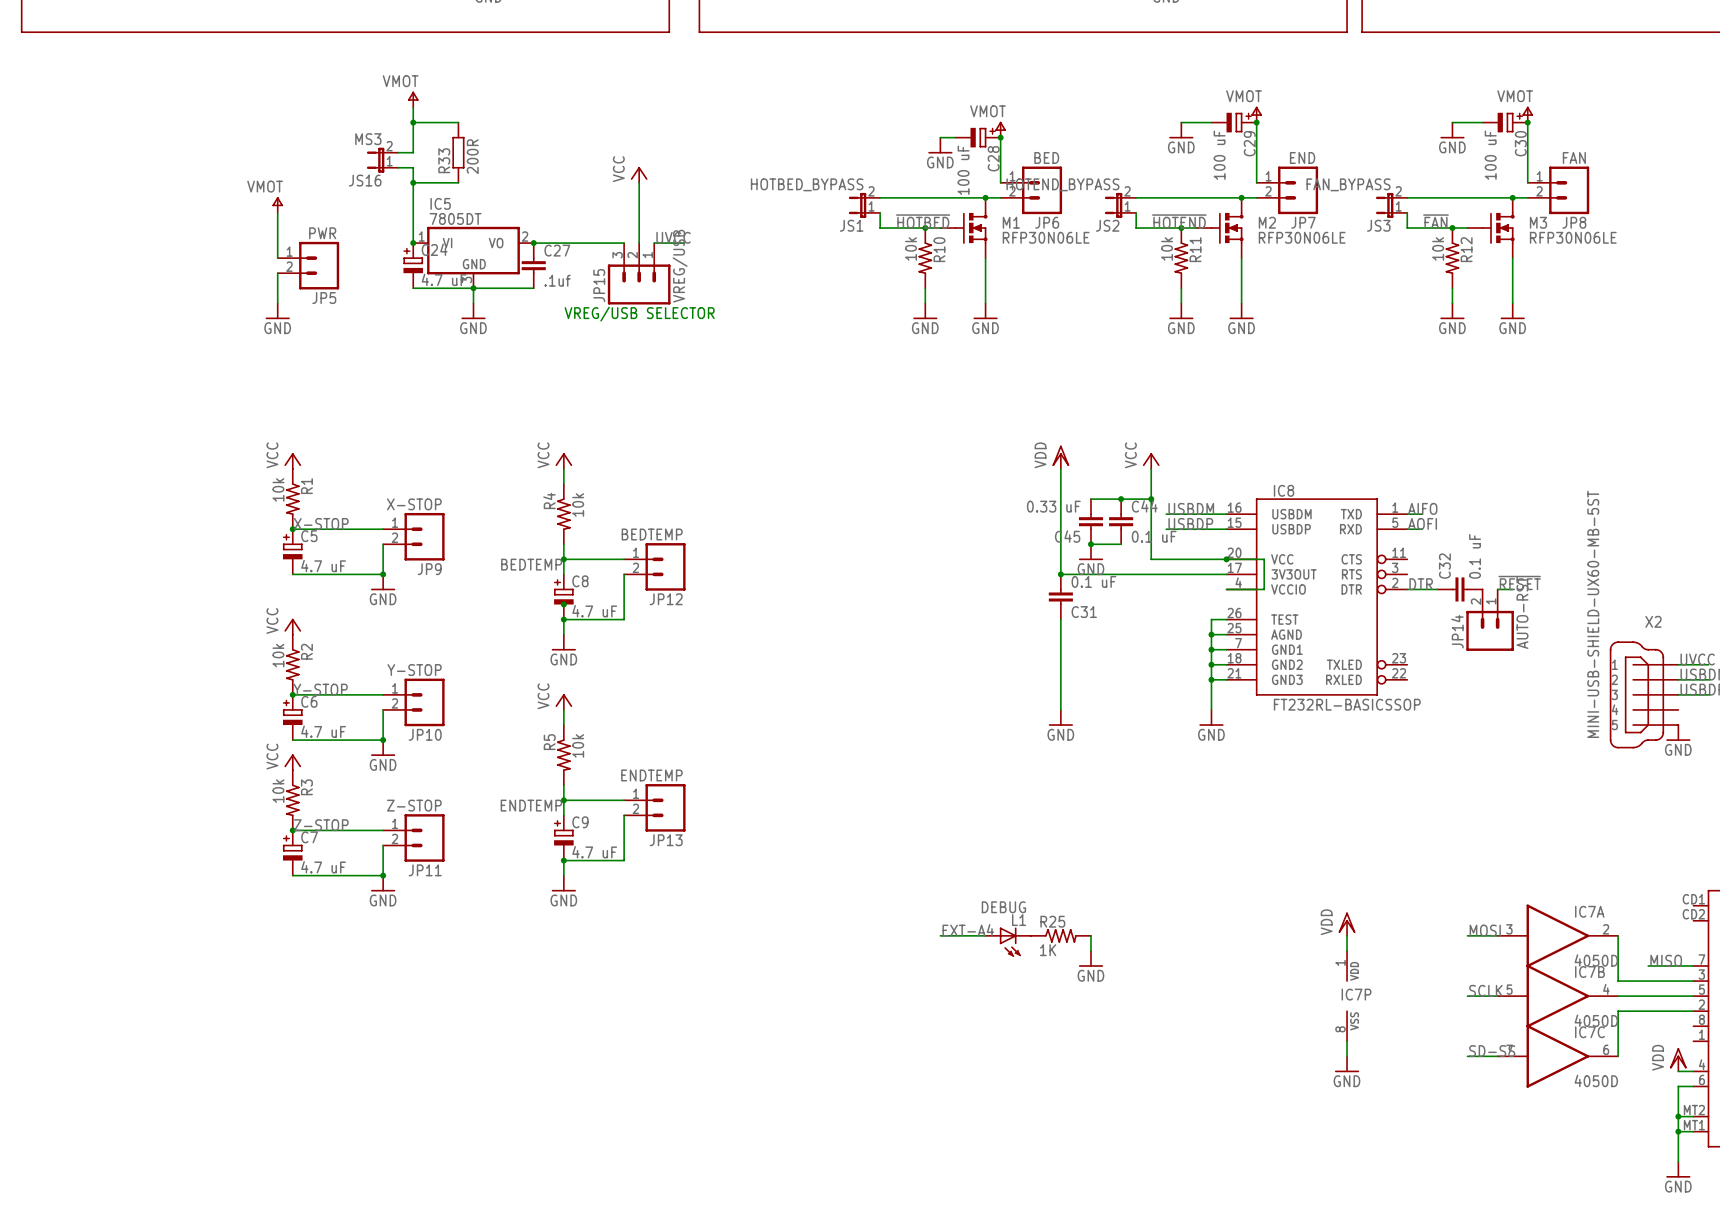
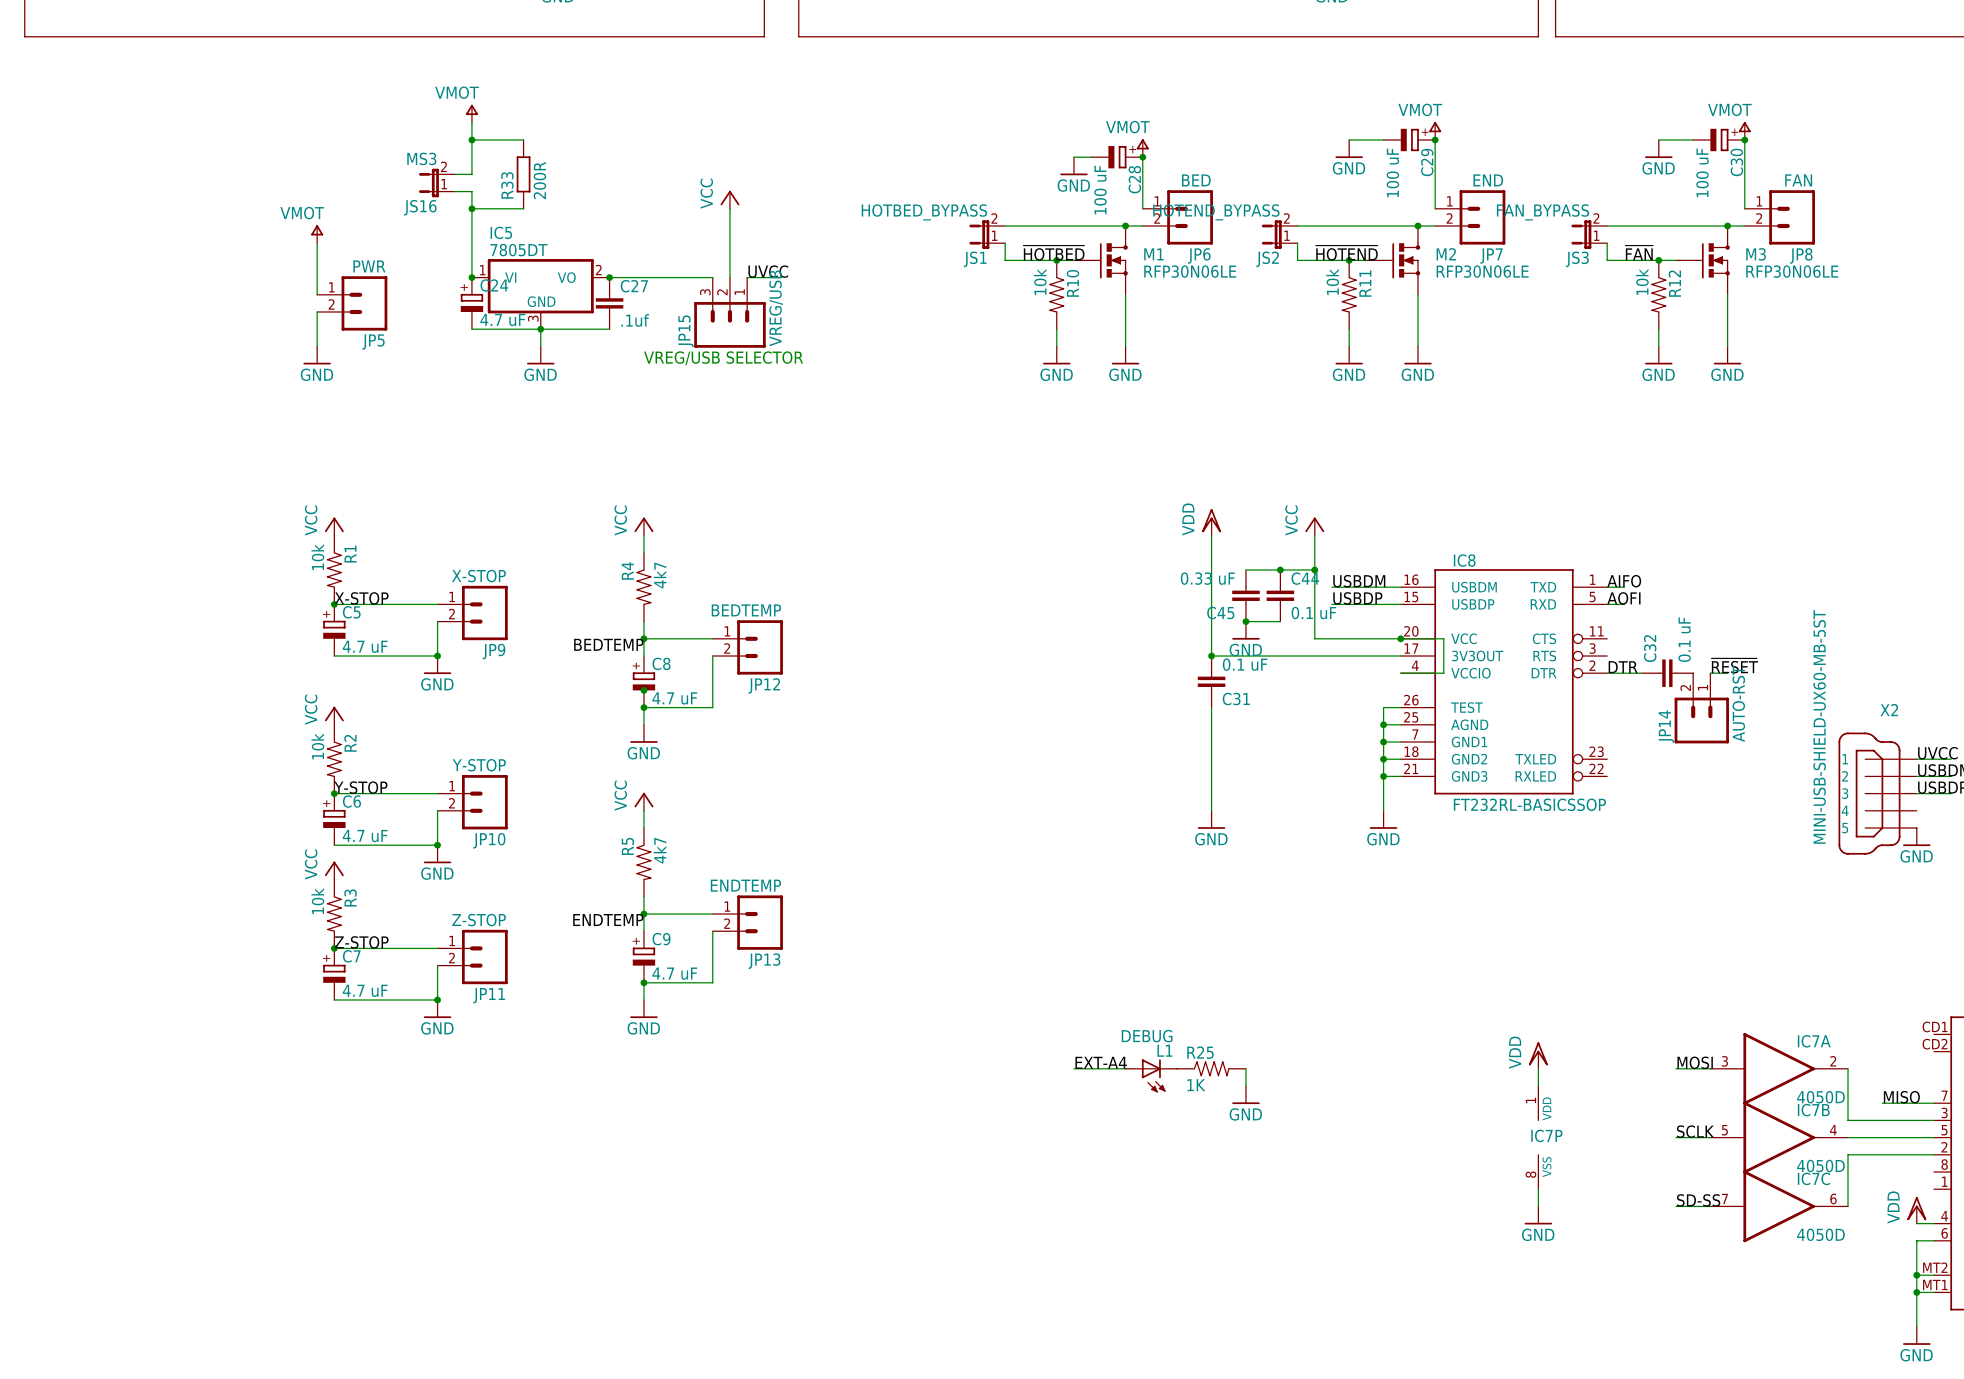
R4 value: 10k (578, 505) -> 4k7 (660, 575)
R5 value: 10k (578, 745) -> 4k7 (660, 850)

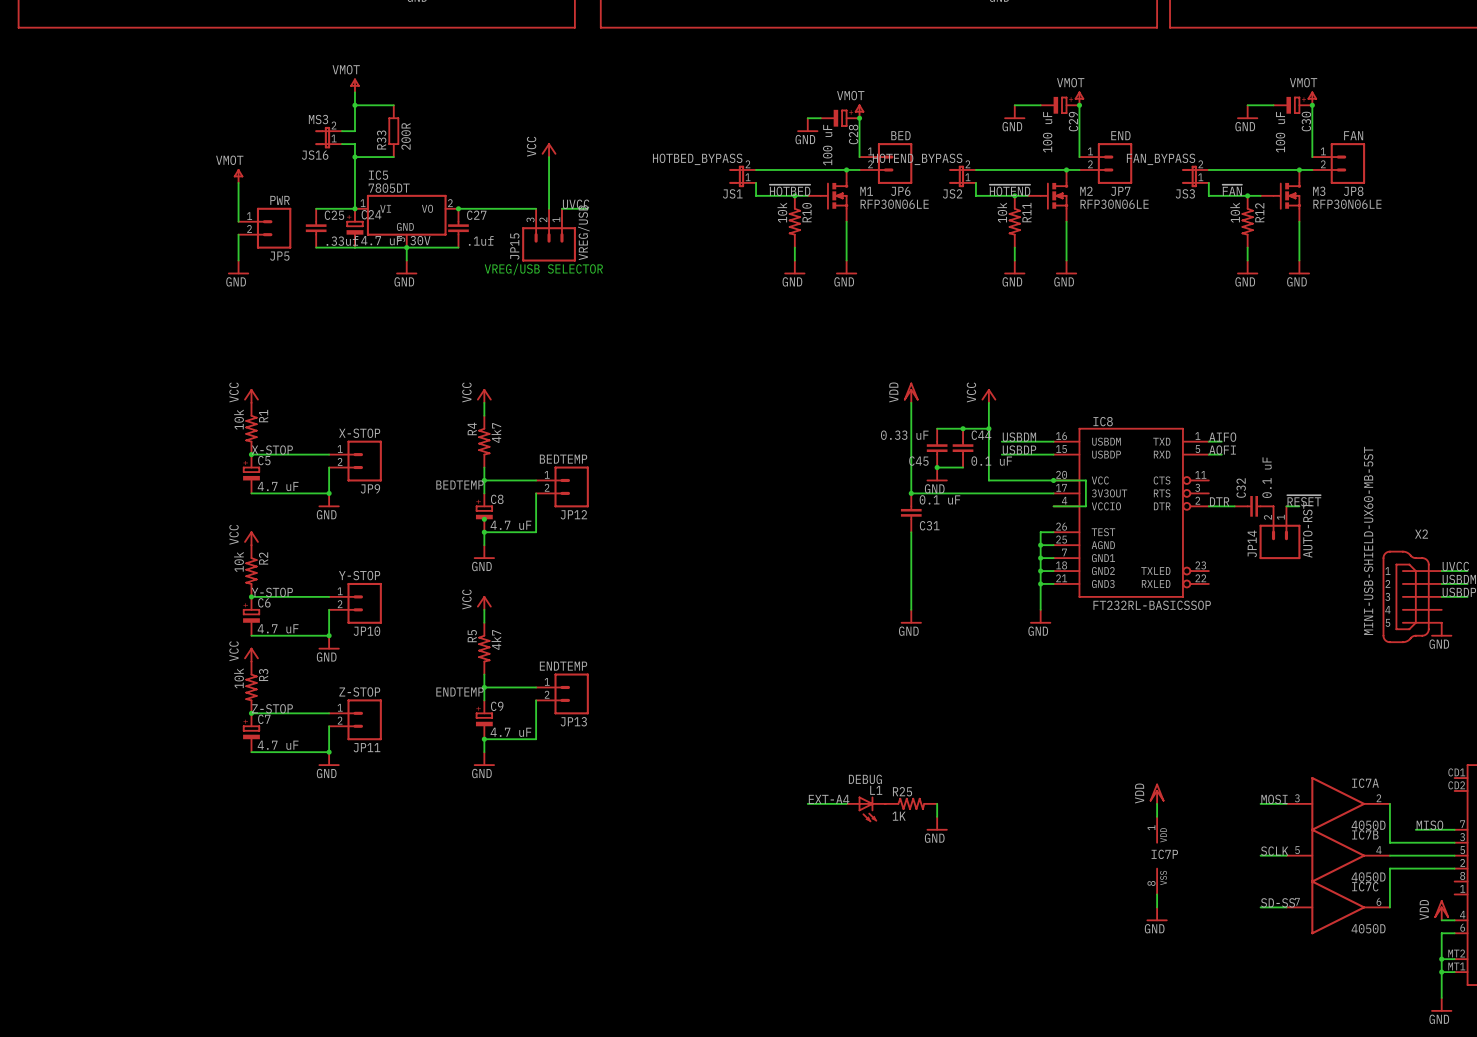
wire: none -> (316, 208) (354, 208)
C25: none -> .33uf (316, 228)
C24 value: 4.7 uF (502, 320) -> 4.7 uF 30V (395, 240)
wire: none -> (316, 247) (354, 247)

